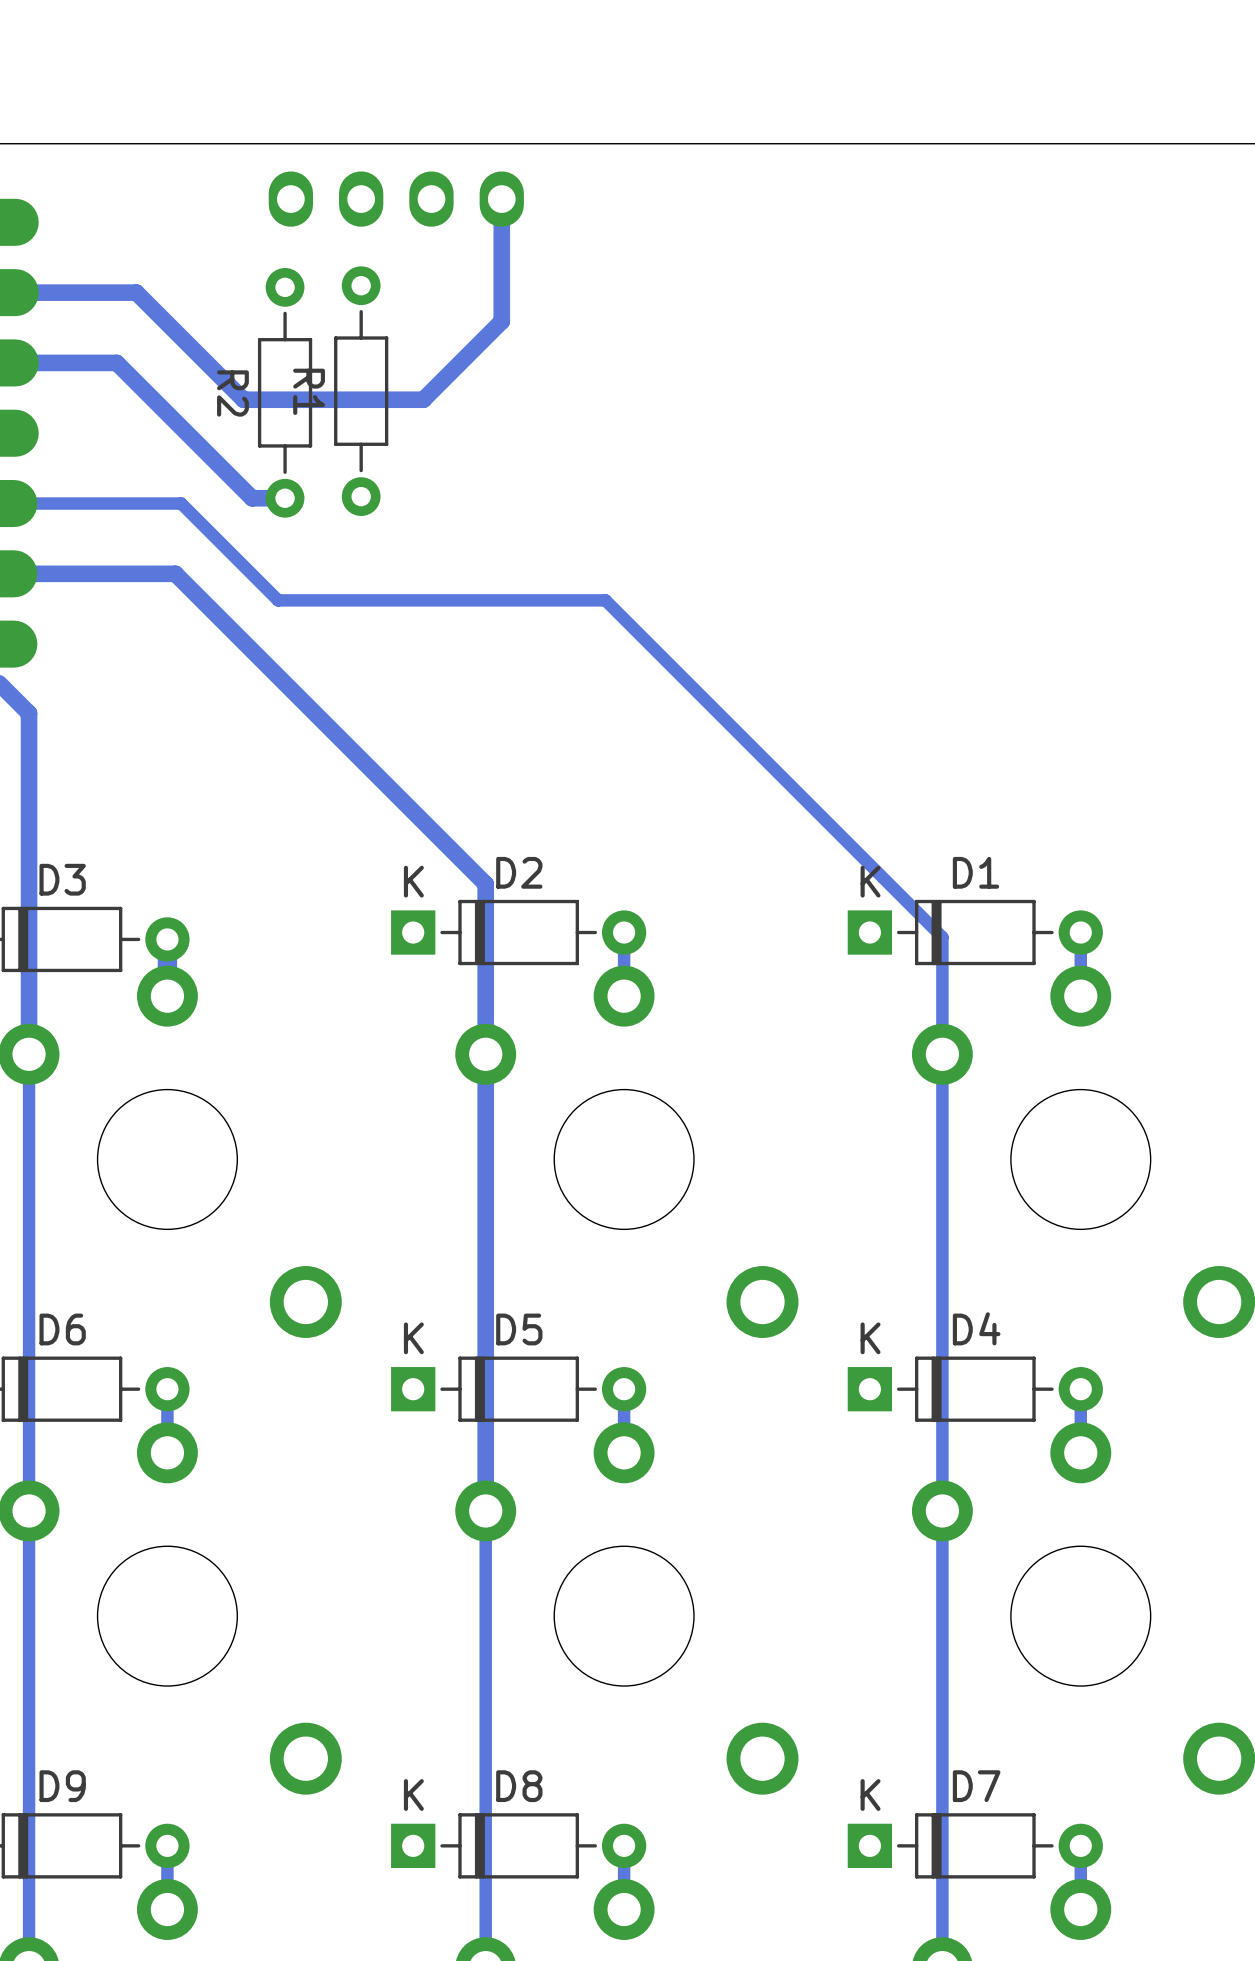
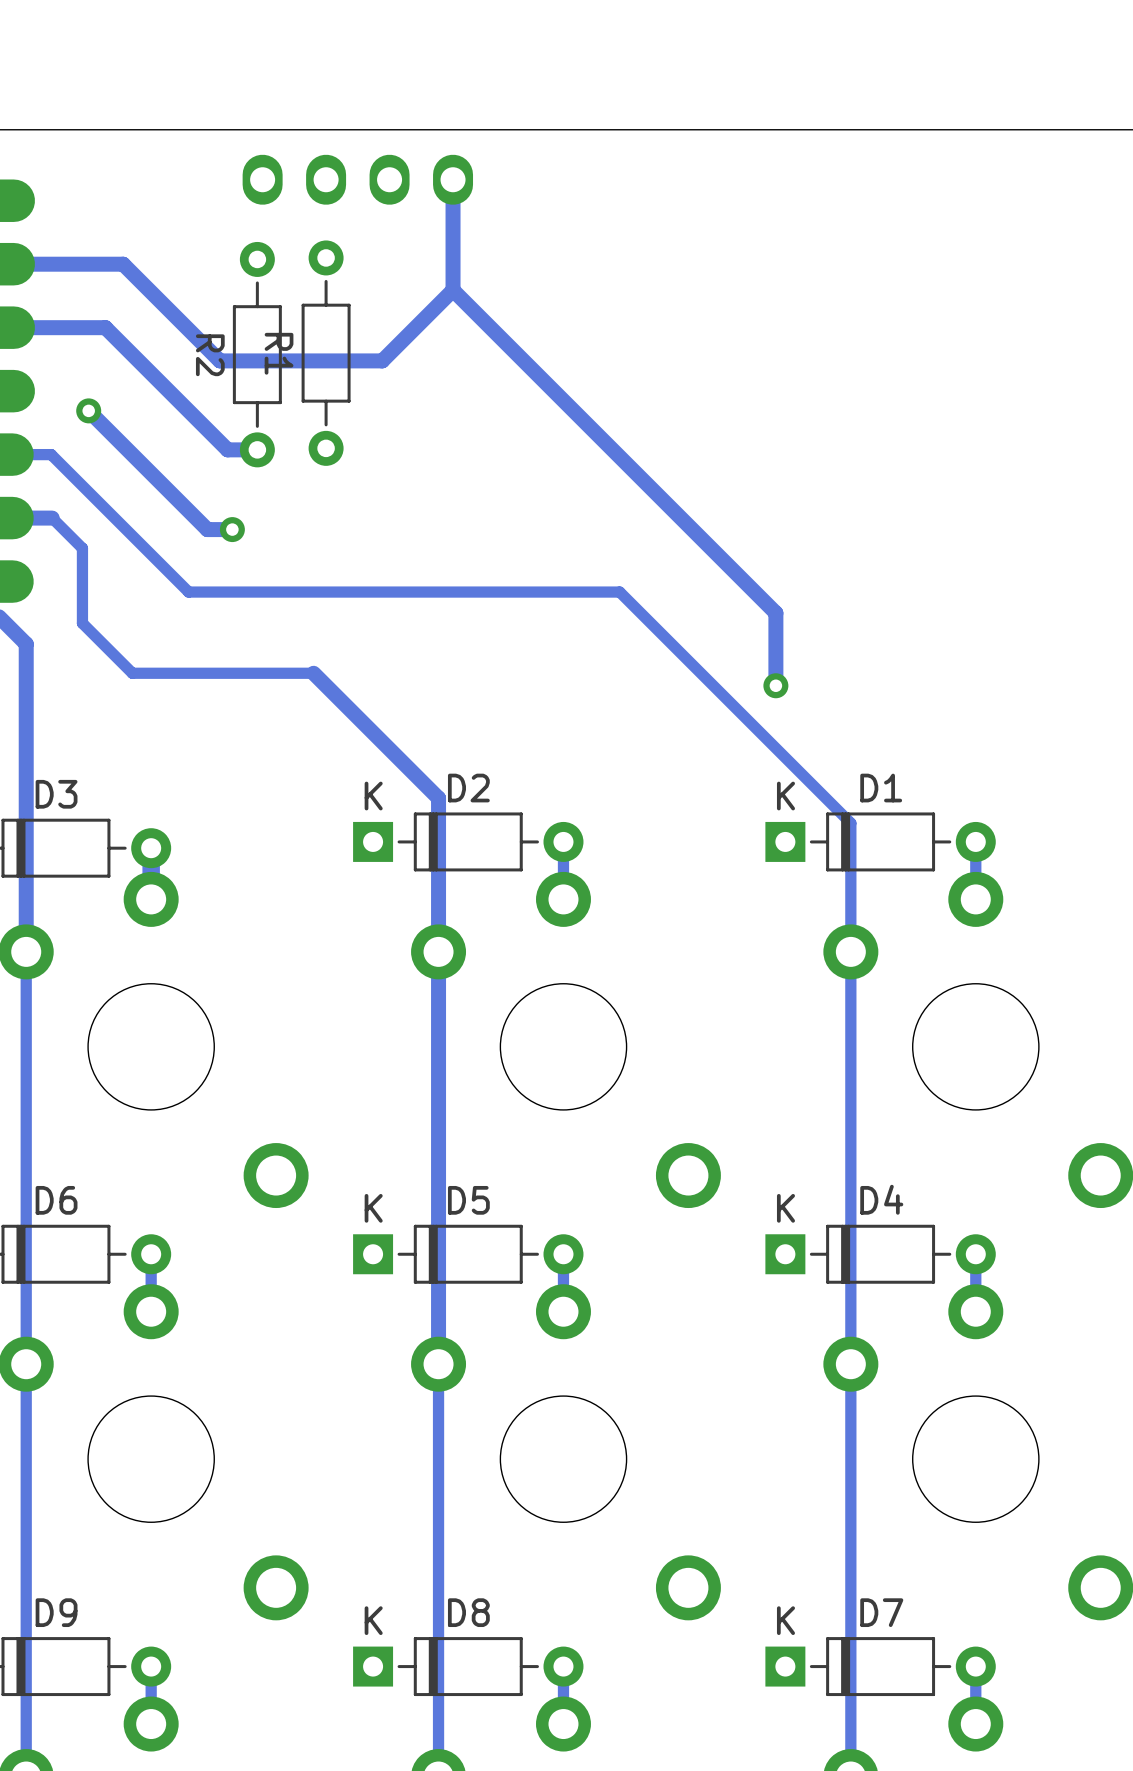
track: none -> (453, 290) (775, 613) (775, 685)
track: none -> (88, 410) (207, 529) (232, 529)
via: none -> (88, 410)
track: (56, 503) (181, 503) (278, 600) (605, 600) (942, 937) -> (51, 454) (188, 592) (619, 592) (850, 823) (850, 846)
track: (57, 573) (175, 573) (347, 745) -> (52, 518) (82, 548) (82, 623) (132, 673) (313, 673)
via: none -> (232, 529)
via: none -> (775, 685)

